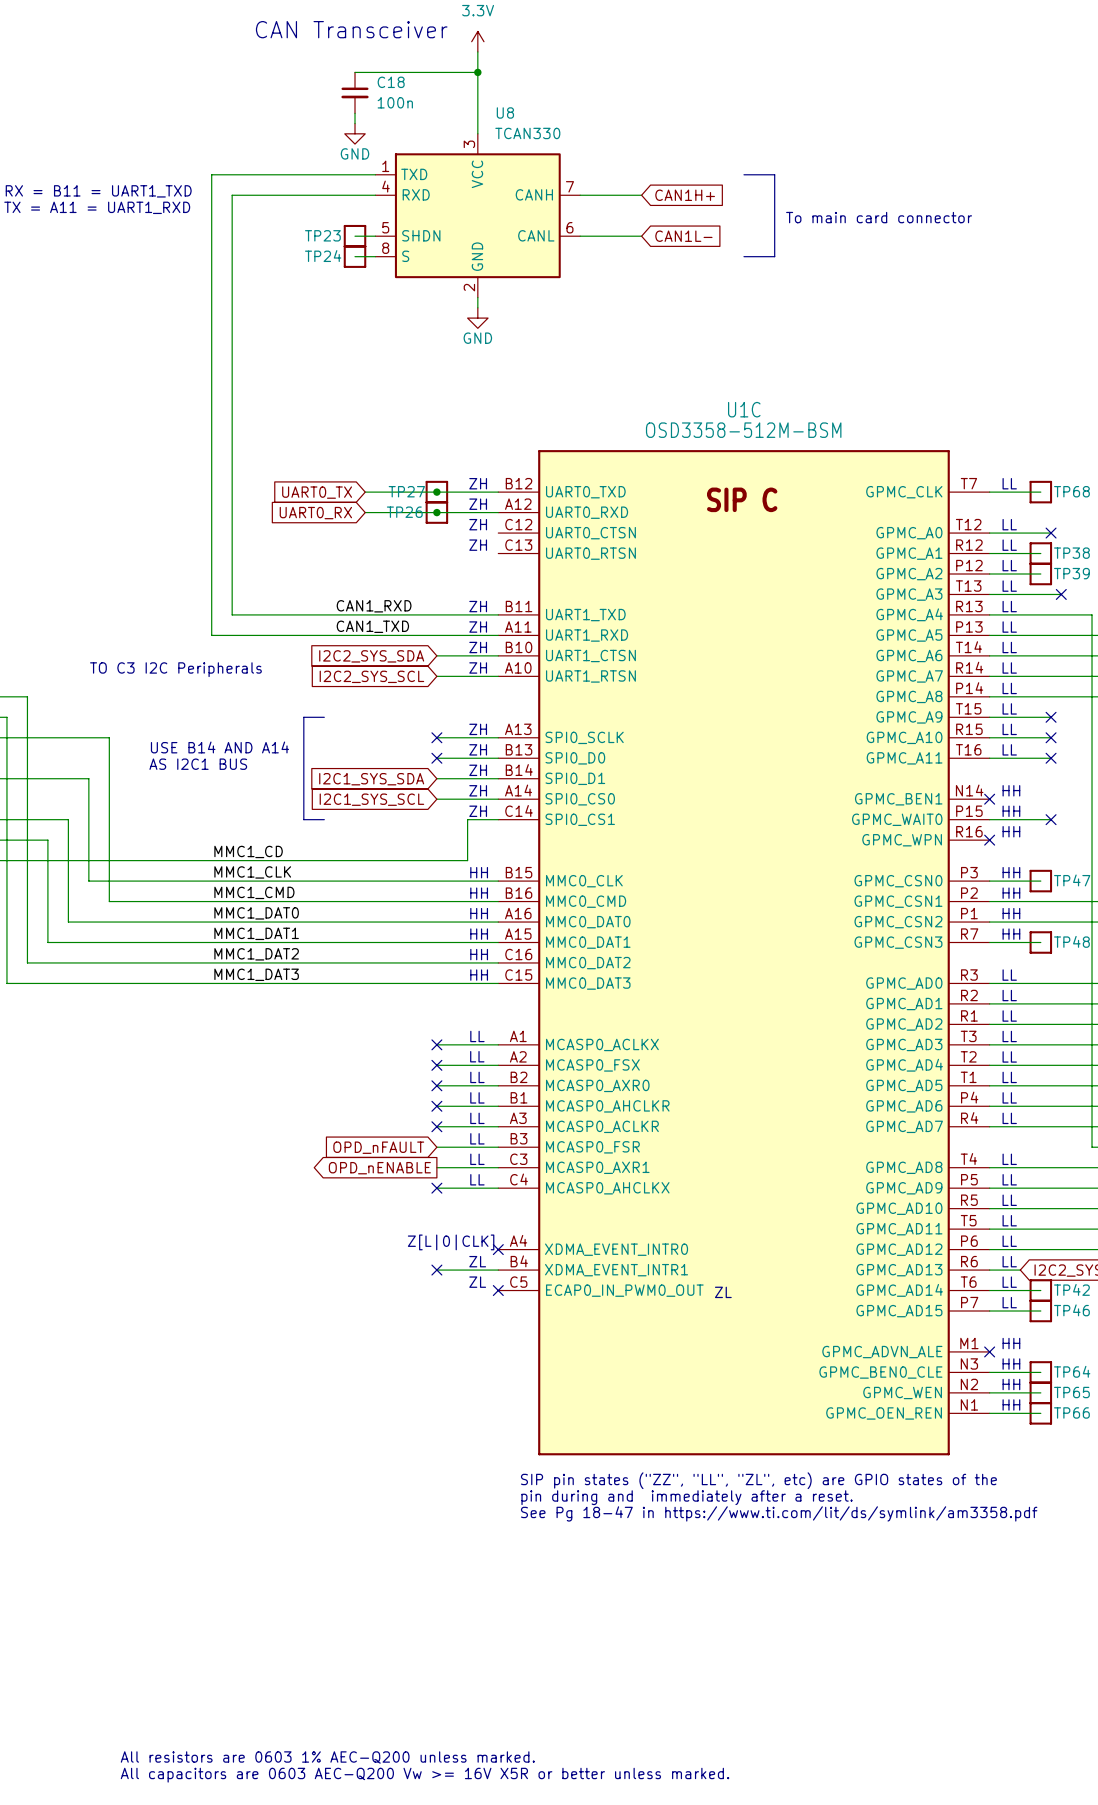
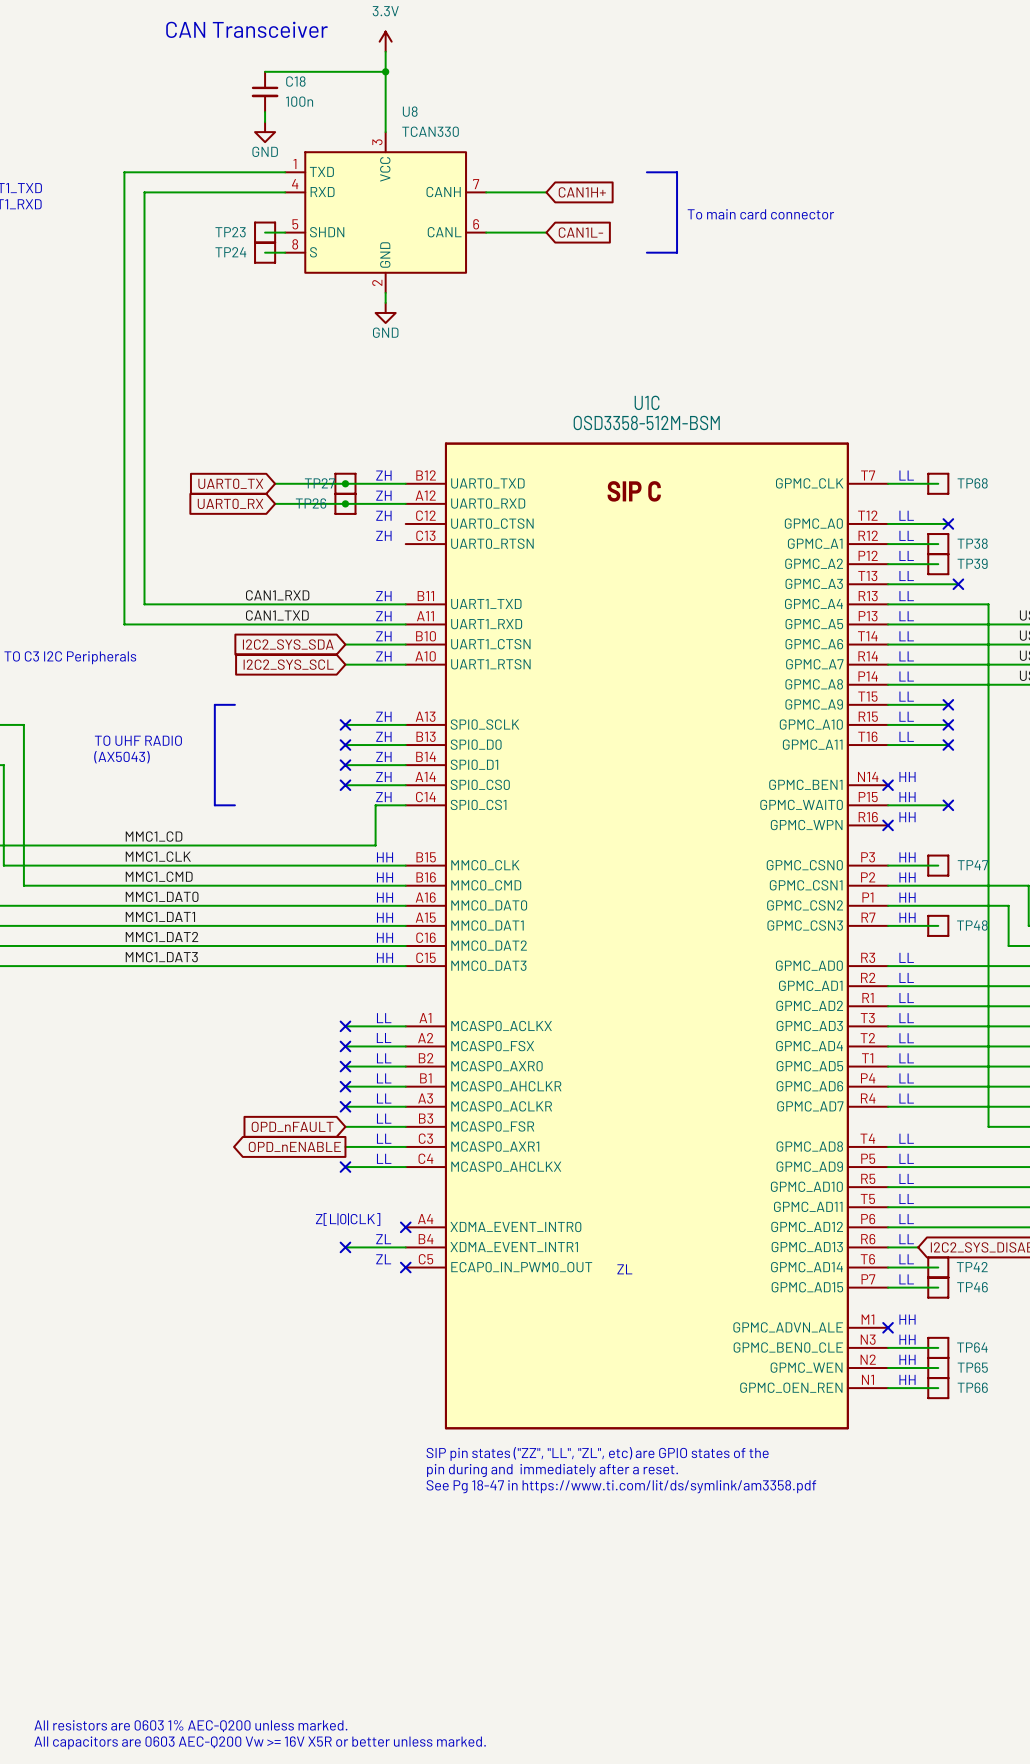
text: USE B14 AND A14 (219, 747) -> none
text: none -> TO UHF RADIO (138, 740)
text: AS I2C1 BUS (198, 764) -> none
text: none -> (AX5043) (121, 757)
no-connect mark: none -> (345, 765)
global label: I2C1_SYS_SDA (371, 779) -> none
global label: I2C1_SYS_SCL (371, 799) -> none
no-connect mark: none -> (345, 785)

